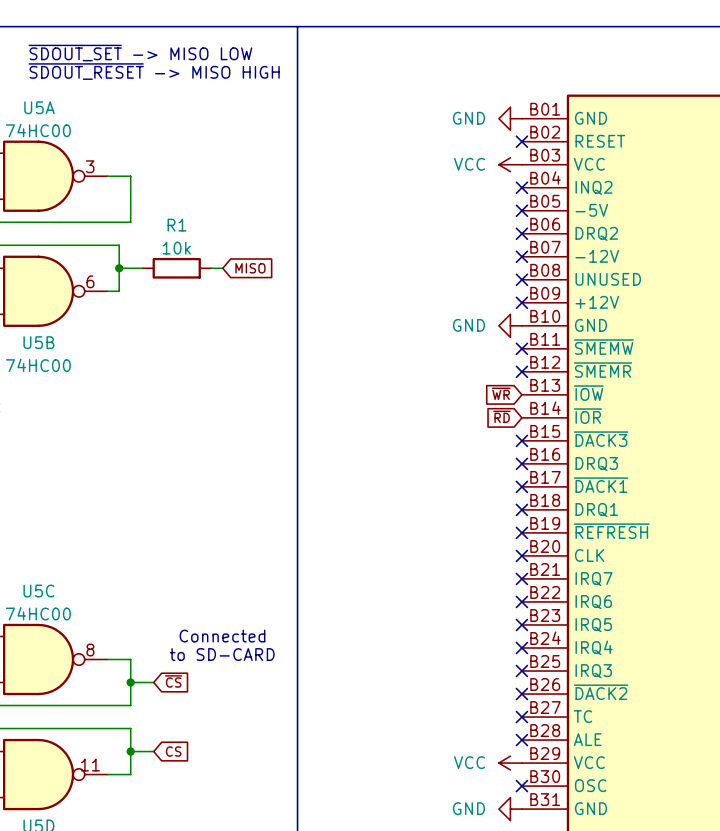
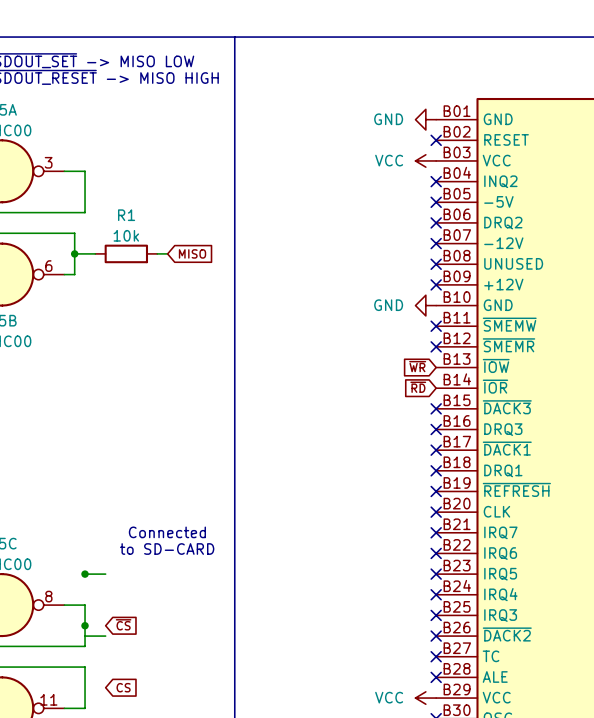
junction: none -> (85, 574)
text position: Connected (222, 636) -> Connected (167, 532)
text position: to SD-CARD (222, 654) -> to SD-CARD (167, 549)
wire: (130, 682) (153, 682) -> (85, 574) (105, 574)
wire: (130, 751) (153, 751) -> (85, 636) (105, 636)
junction: (130, 751) -> none

